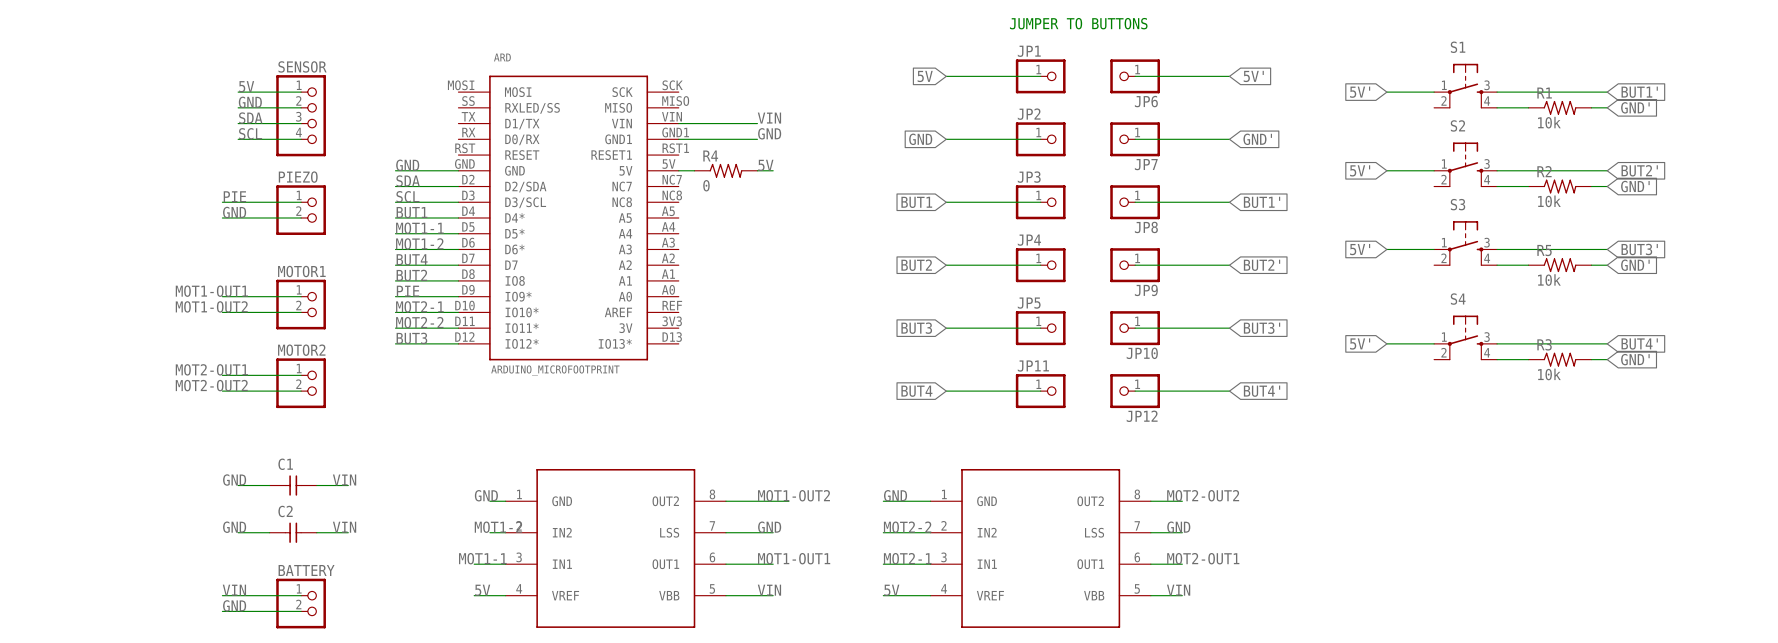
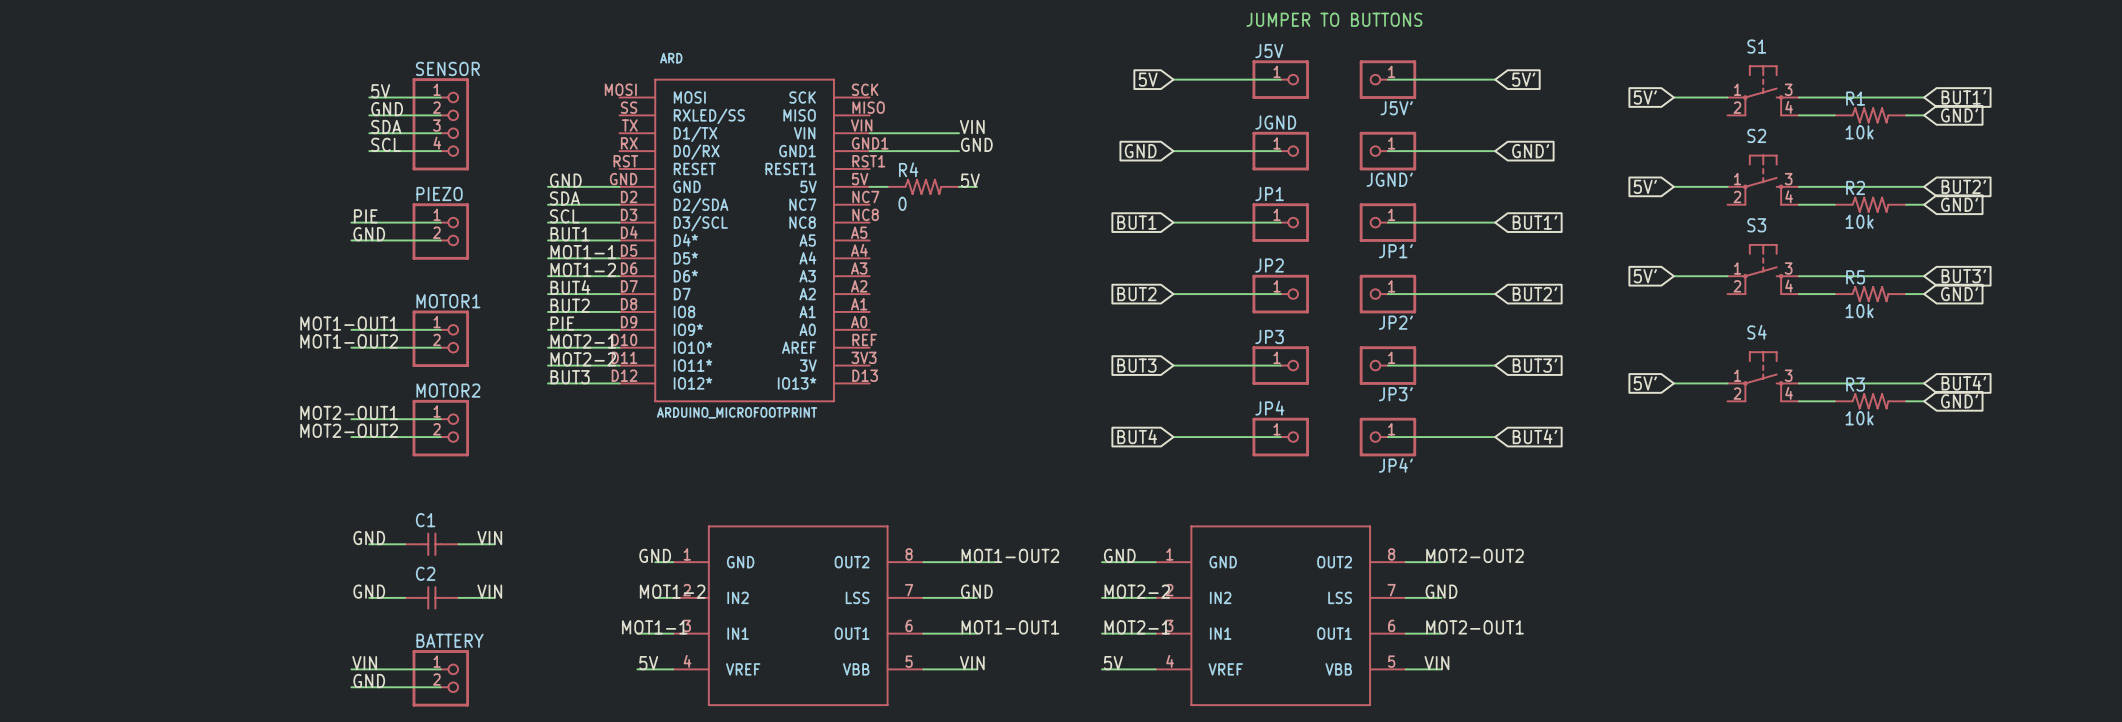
JP1 name: JP1 (1029, 51) -> J5V (1269, 51)
JP6 name: JP6 (1146, 101) -> J5V' (1396, 108)
JP2 name: JP2 (1029, 114) -> JGND (1275, 122)
JP7 name: JP7 (1146, 164) -> JGND' (1389, 179)
JP3 name: JP3 (1029, 177) -> JP1 (1269, 194)
JP8 name: JP8 (1146, 227) -> JP1' (1395, 251)
JP4 name: JP4 (1029, 240) -> JP2 (1269, 265)
JP9 name: JP9 (1146, 290) -> JP2' (1395, 322)
JP5 name: JP5 (1029, 303) -> JP3 (1269, 336)
JP10 name: JP10 (1142, 353) -> JP3' (1395, 394)
JP11 name: JP11 (1033, 366) -> JP4 (1269, 408)
JP12 name: JP12 (1142, 416) -> JP4' (1395, 465)

